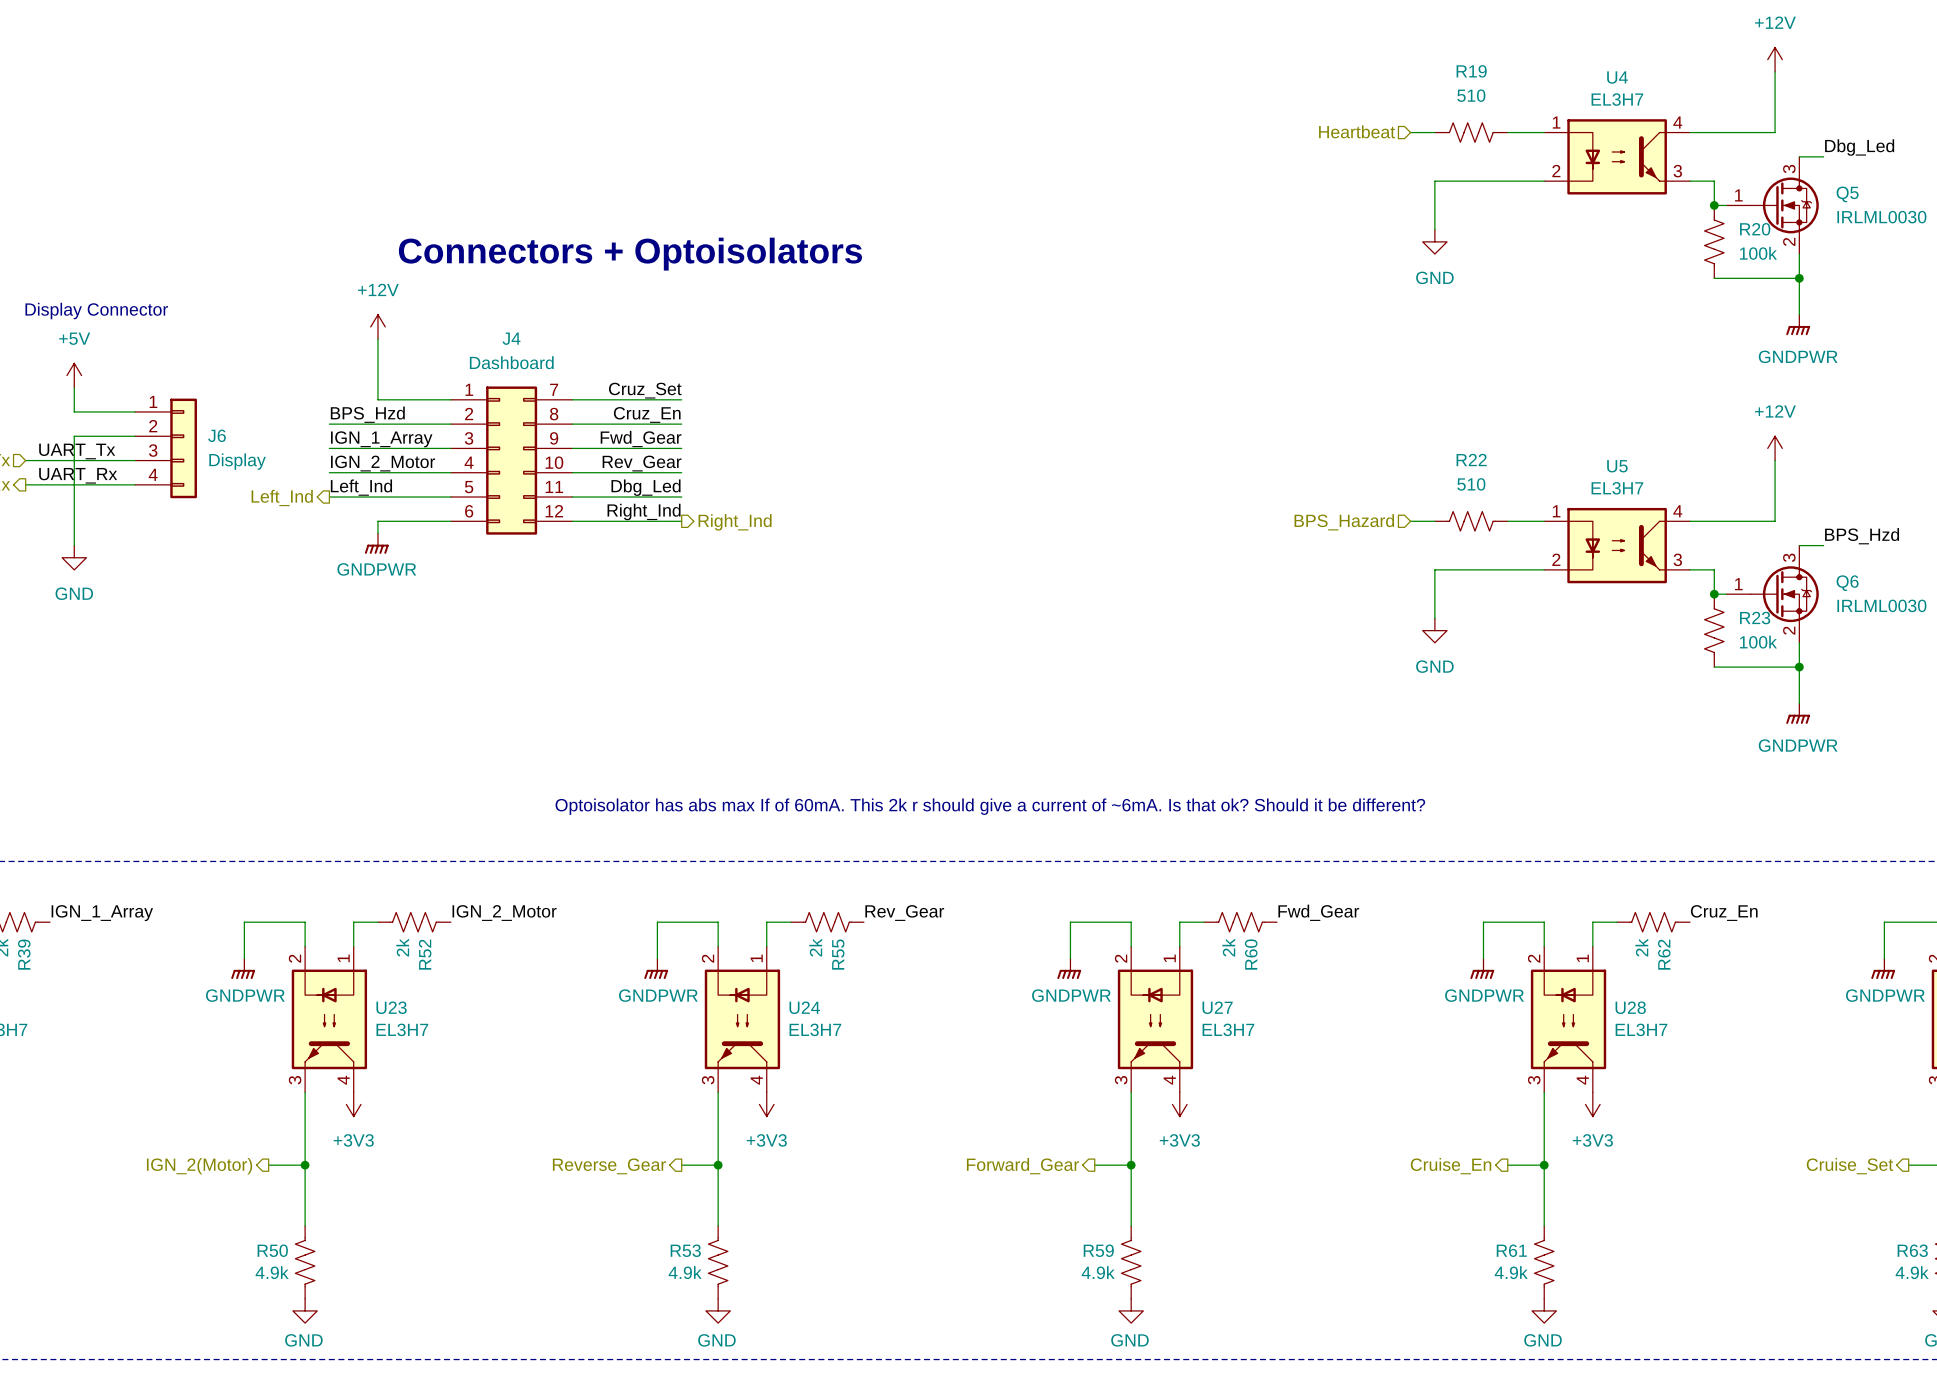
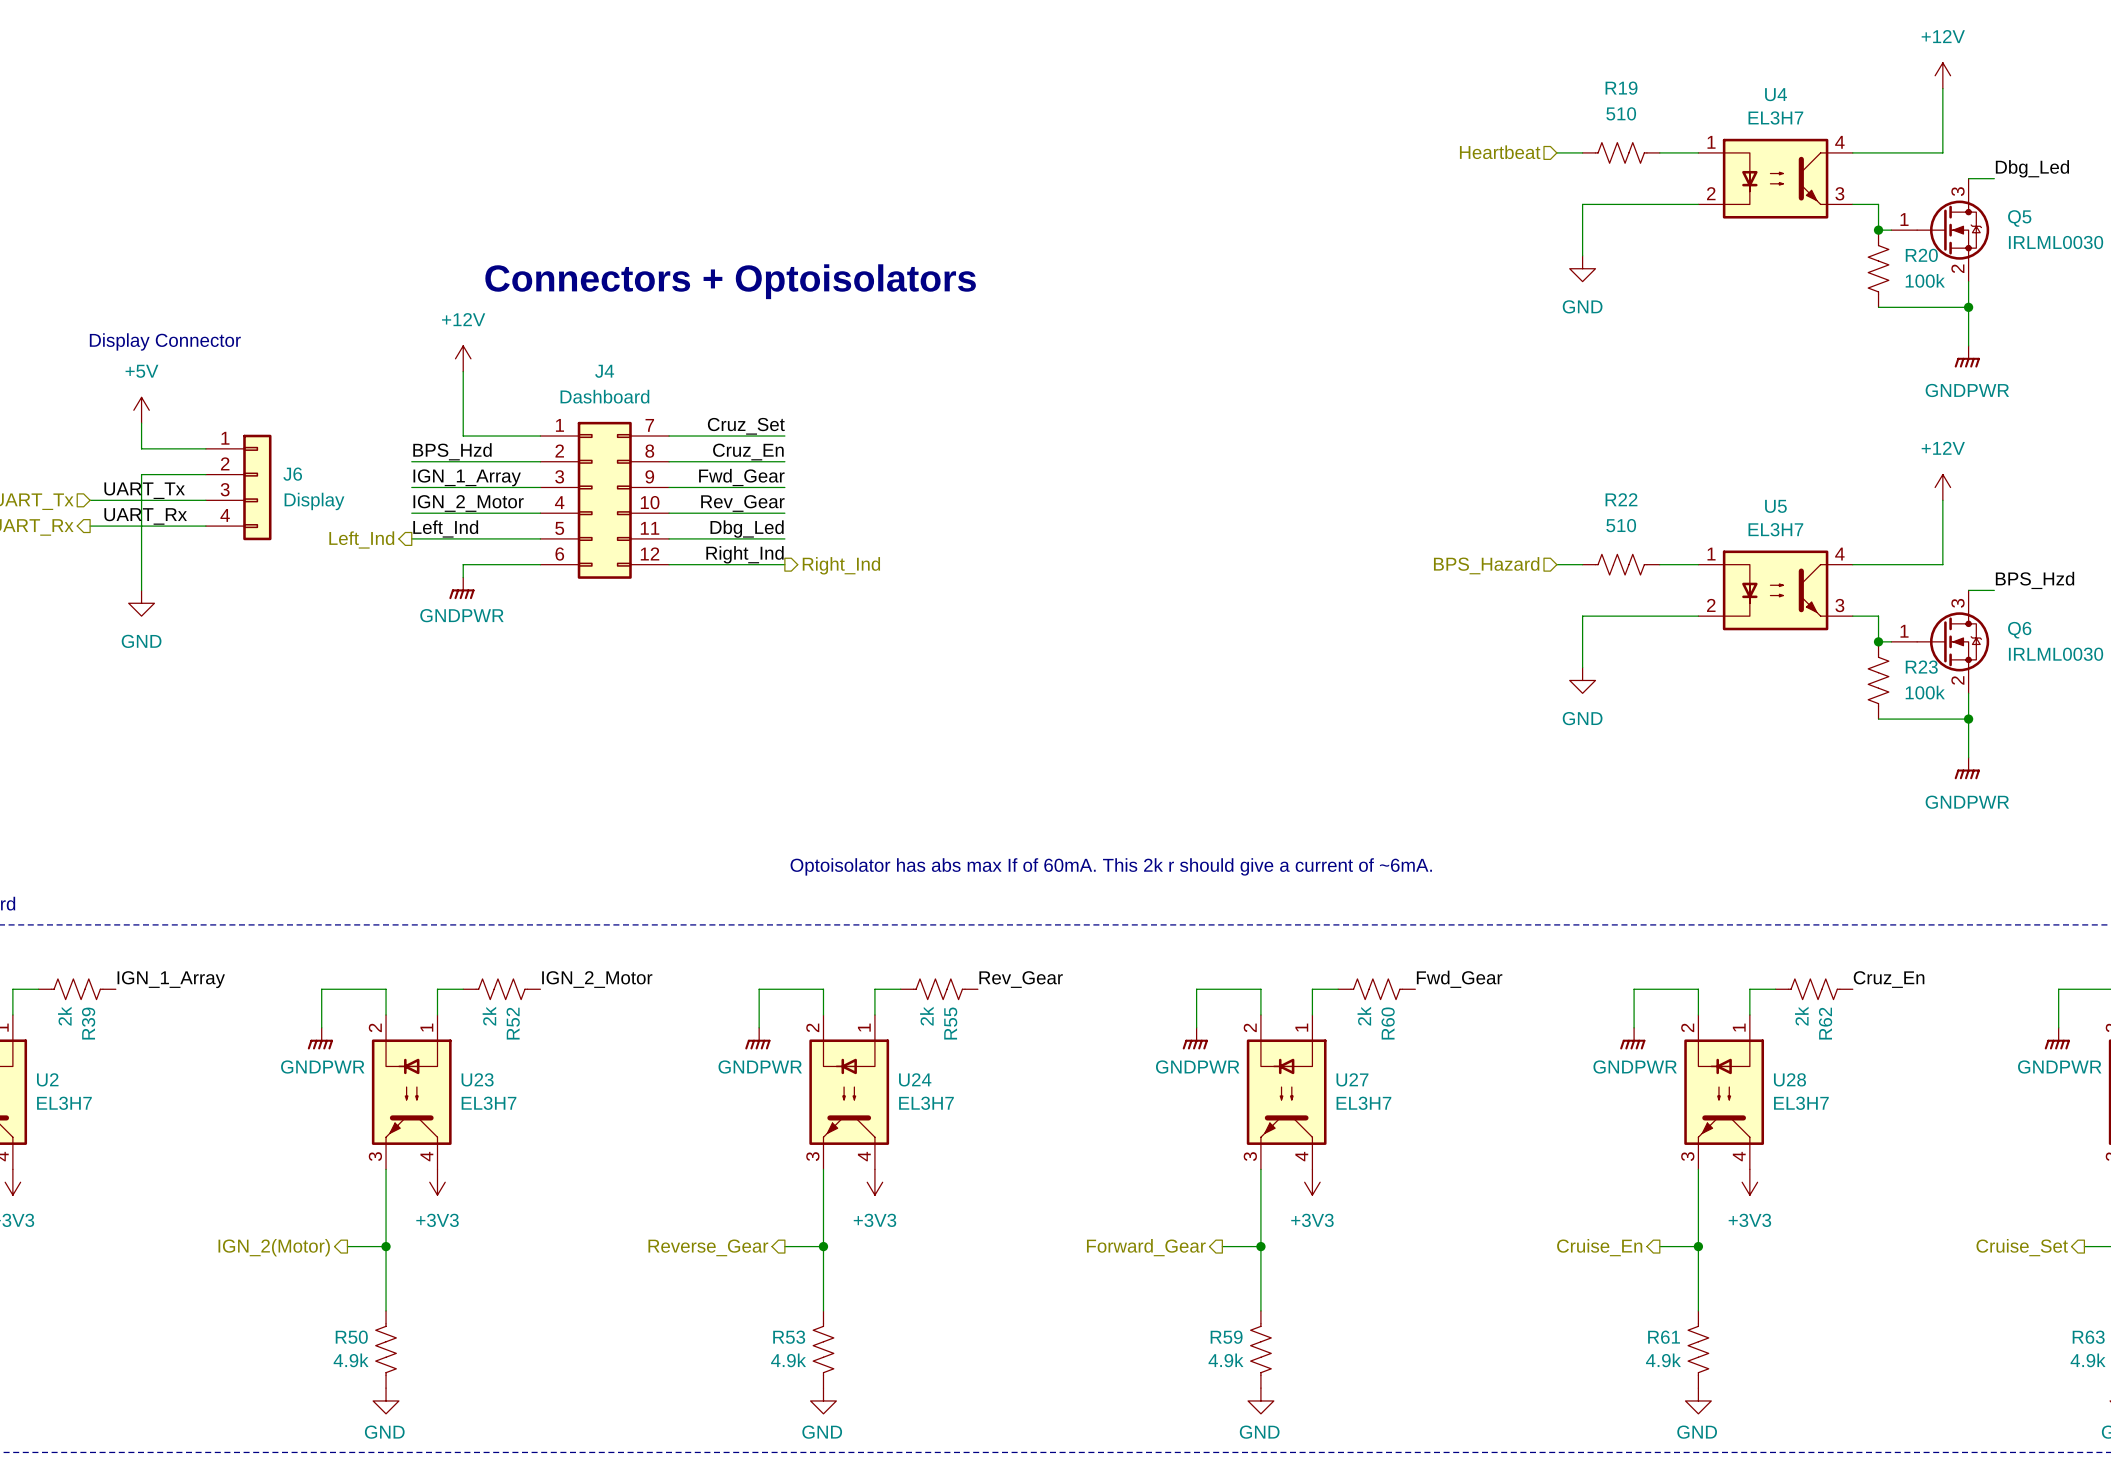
text: Optoisolator has abs max If of 60mA. This 2k r should give a current of ~6mA. Is that ok? Should it be different? (990, 806) -> Optoisolator has abs max If of 60mA. This 2k r should give a current of ~6mA. (1111, 866)

